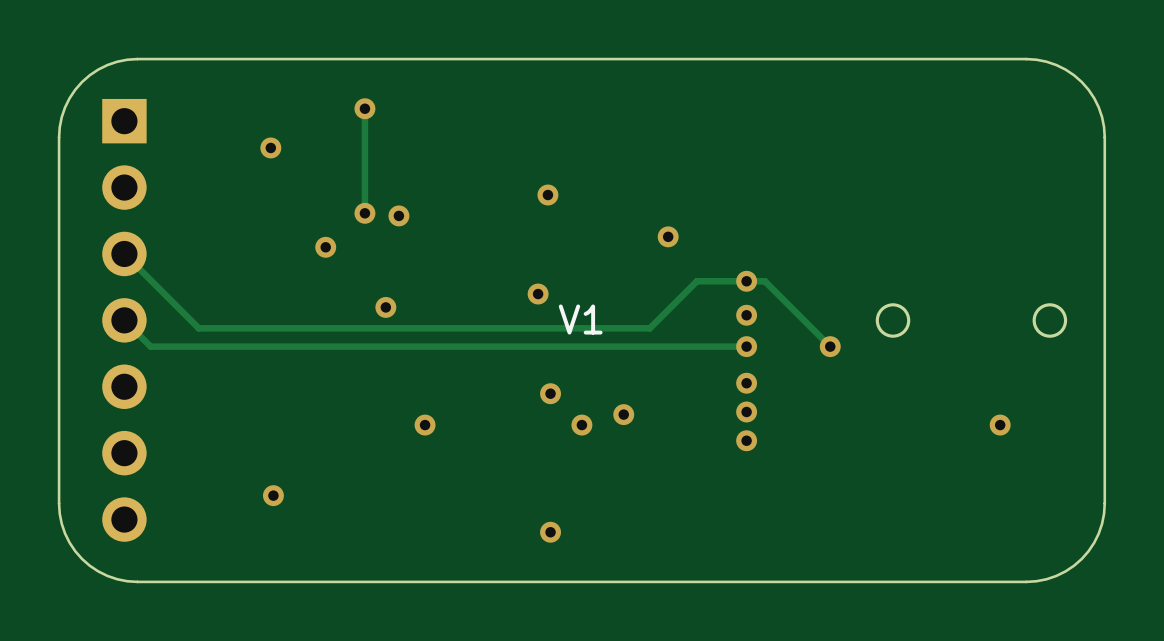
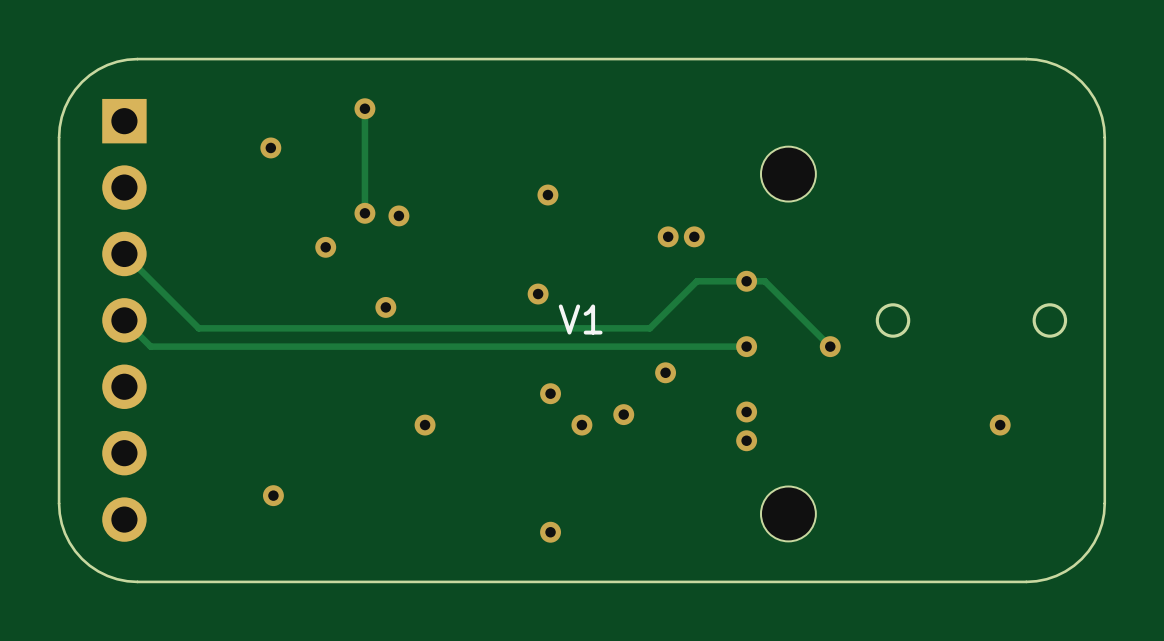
part: none -> (788, 174)
via: none -> (694, 236)
via: (746, 315) -> none
via: none -> (665, 372)
via: (746, 383) -> none
part: none -> (788, 513)

